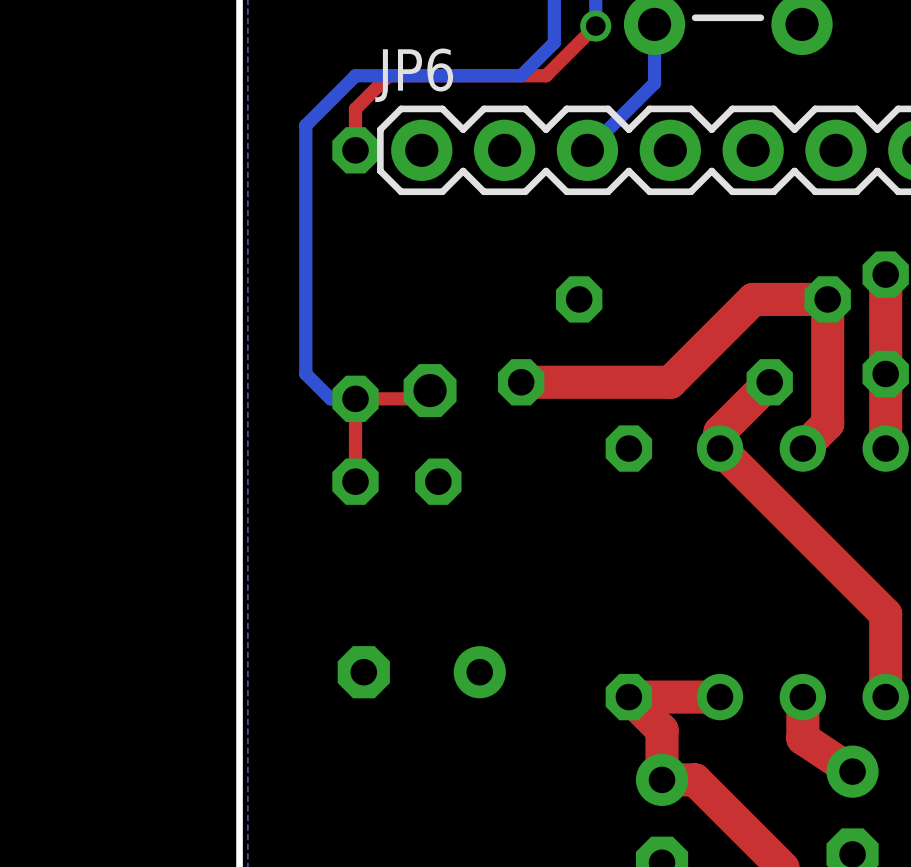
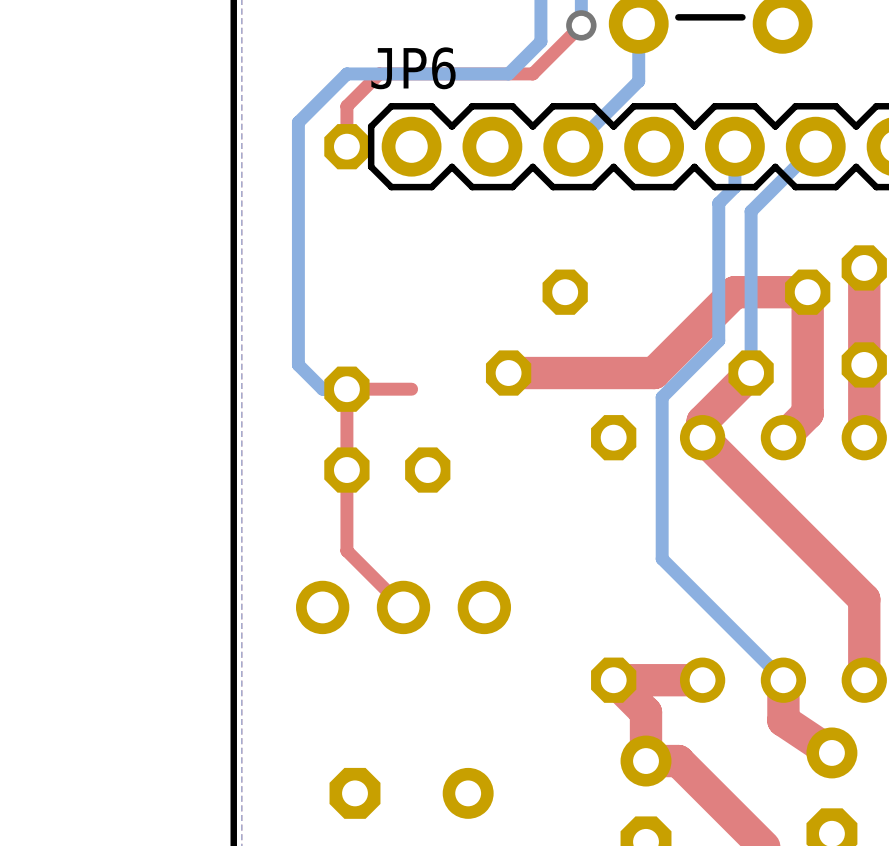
bottom track: none -> (734, 146) (734, 187) (718, 203) (718, 340) (662, 397) (662, 558) (783, 680)
bottom track: none -> (815, 146) (751, 211) (751, 373)
part: (430, 390) -> none
top track: none -> (346, 470) (346, 550) (403, 607)
part: none -> (403, 607)
part position: (421, 672) -> (411, 793)

